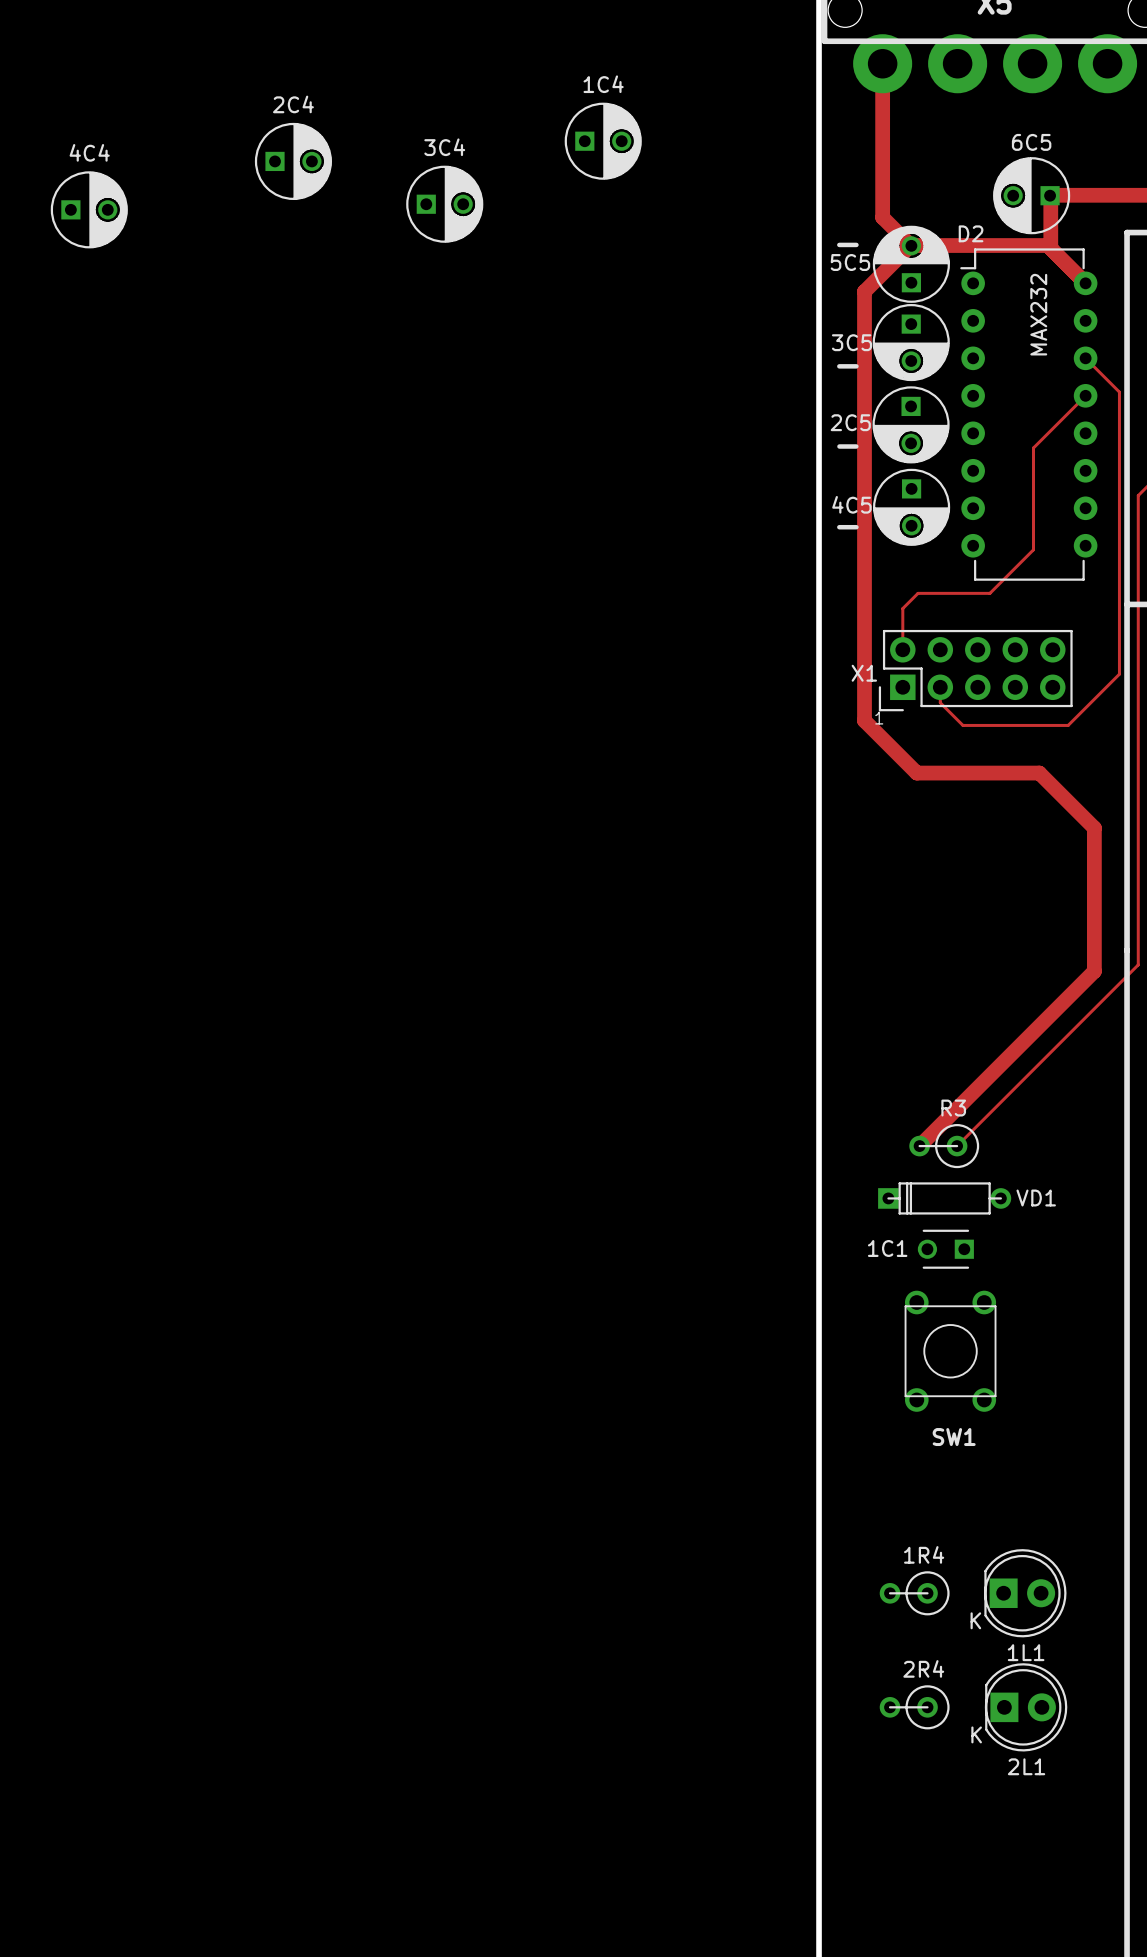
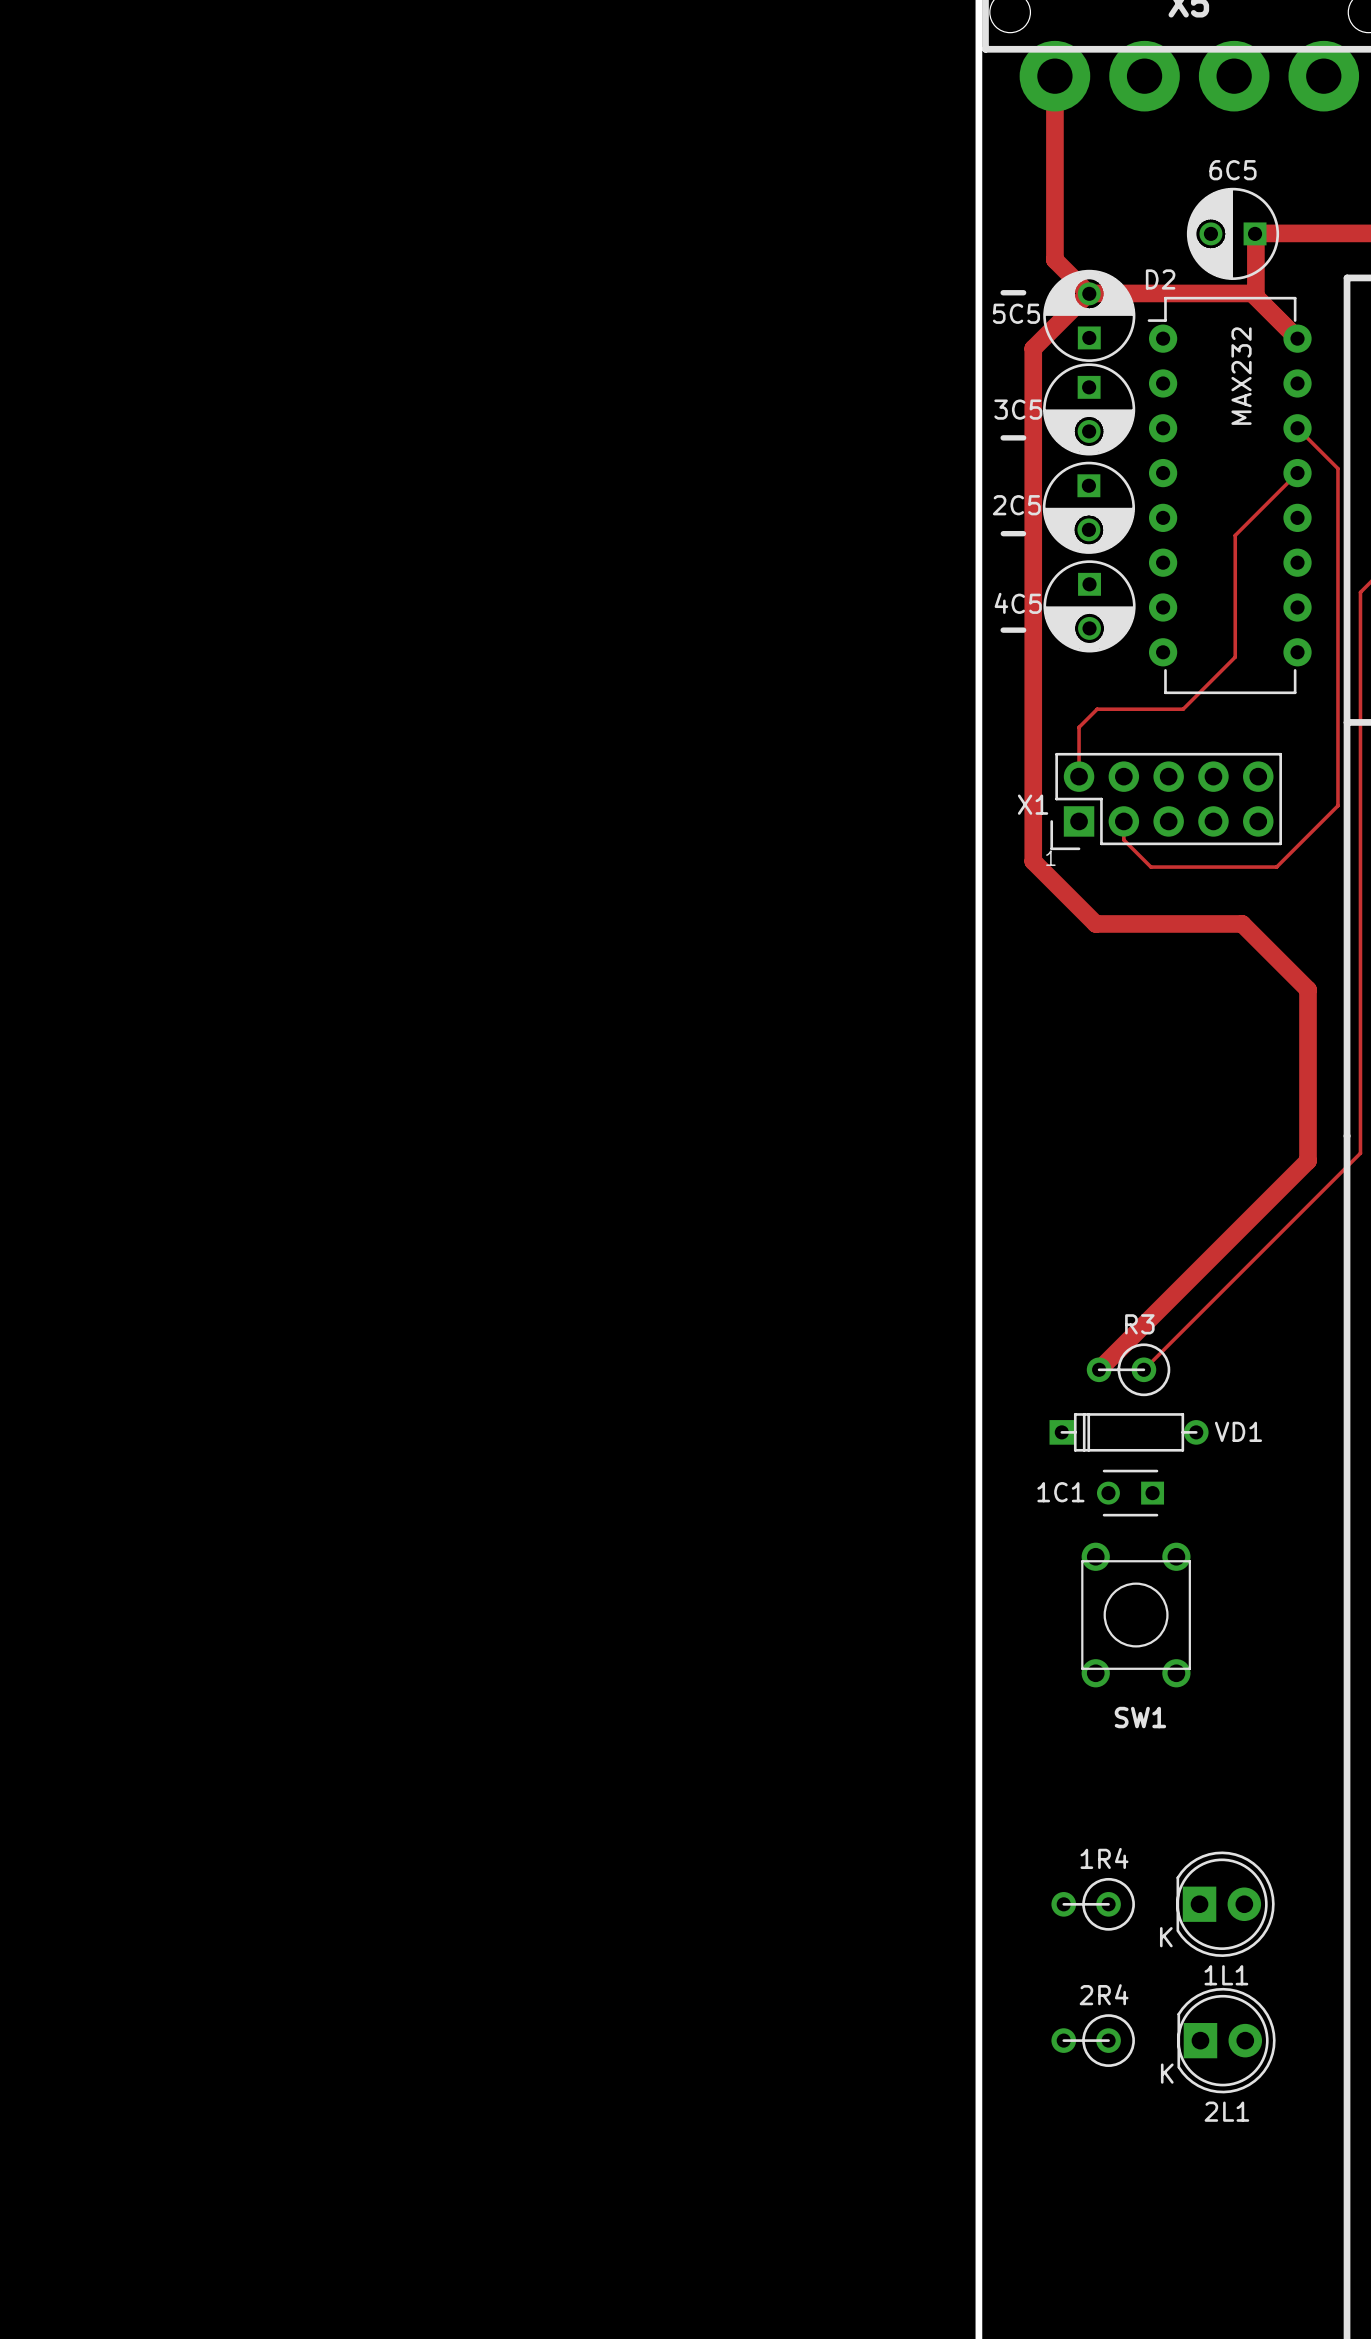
1C4: (603, 141) -> none
2C4: (293, 161) -> none
3C4: (444, 204) -> none
4C4: (89, 209) -> none

